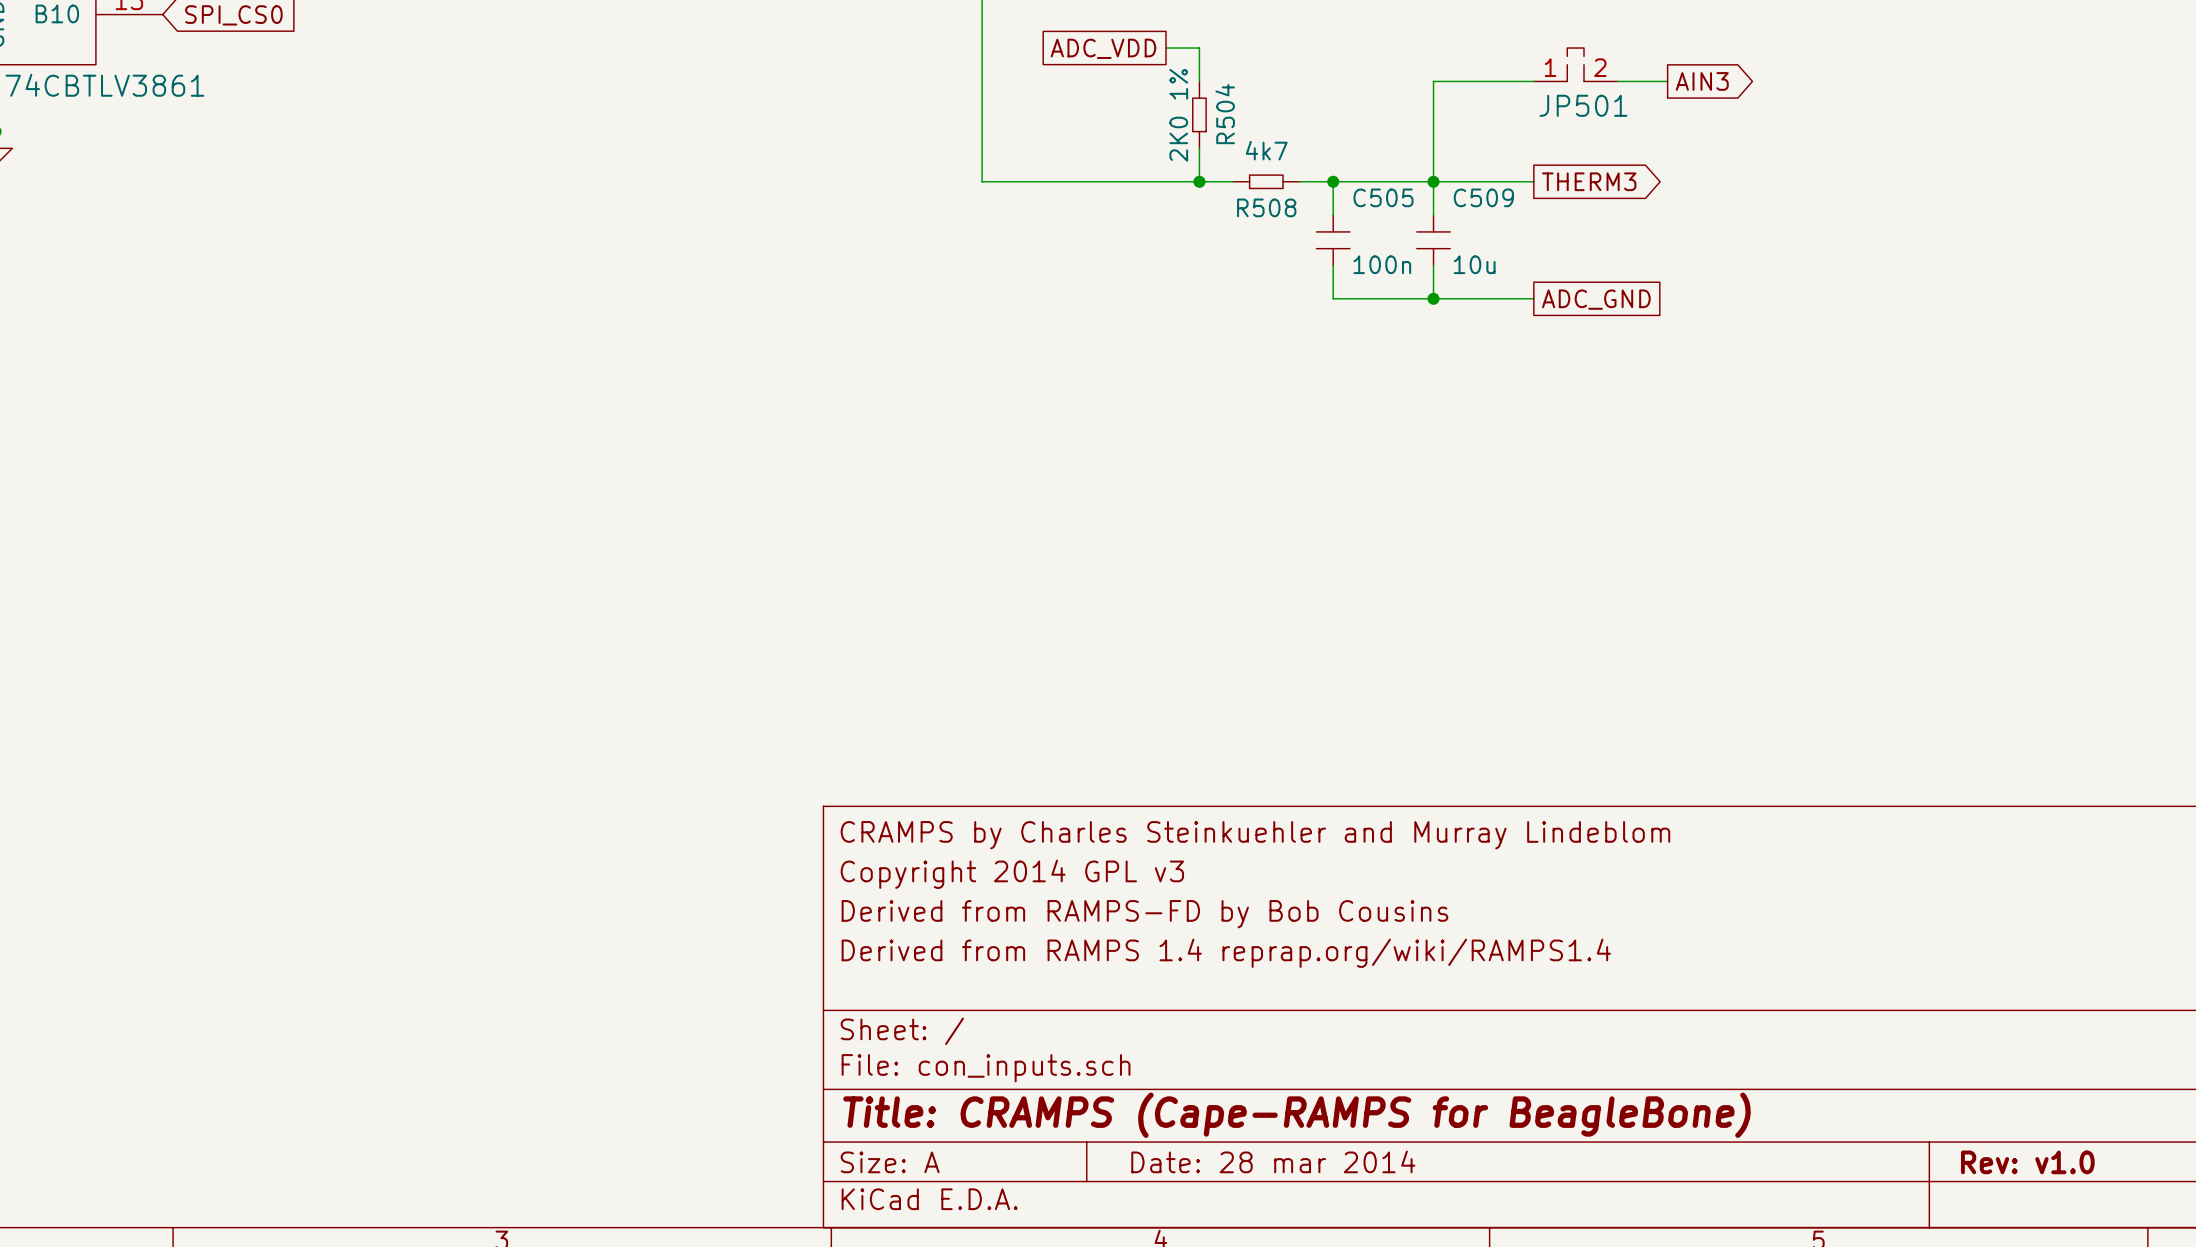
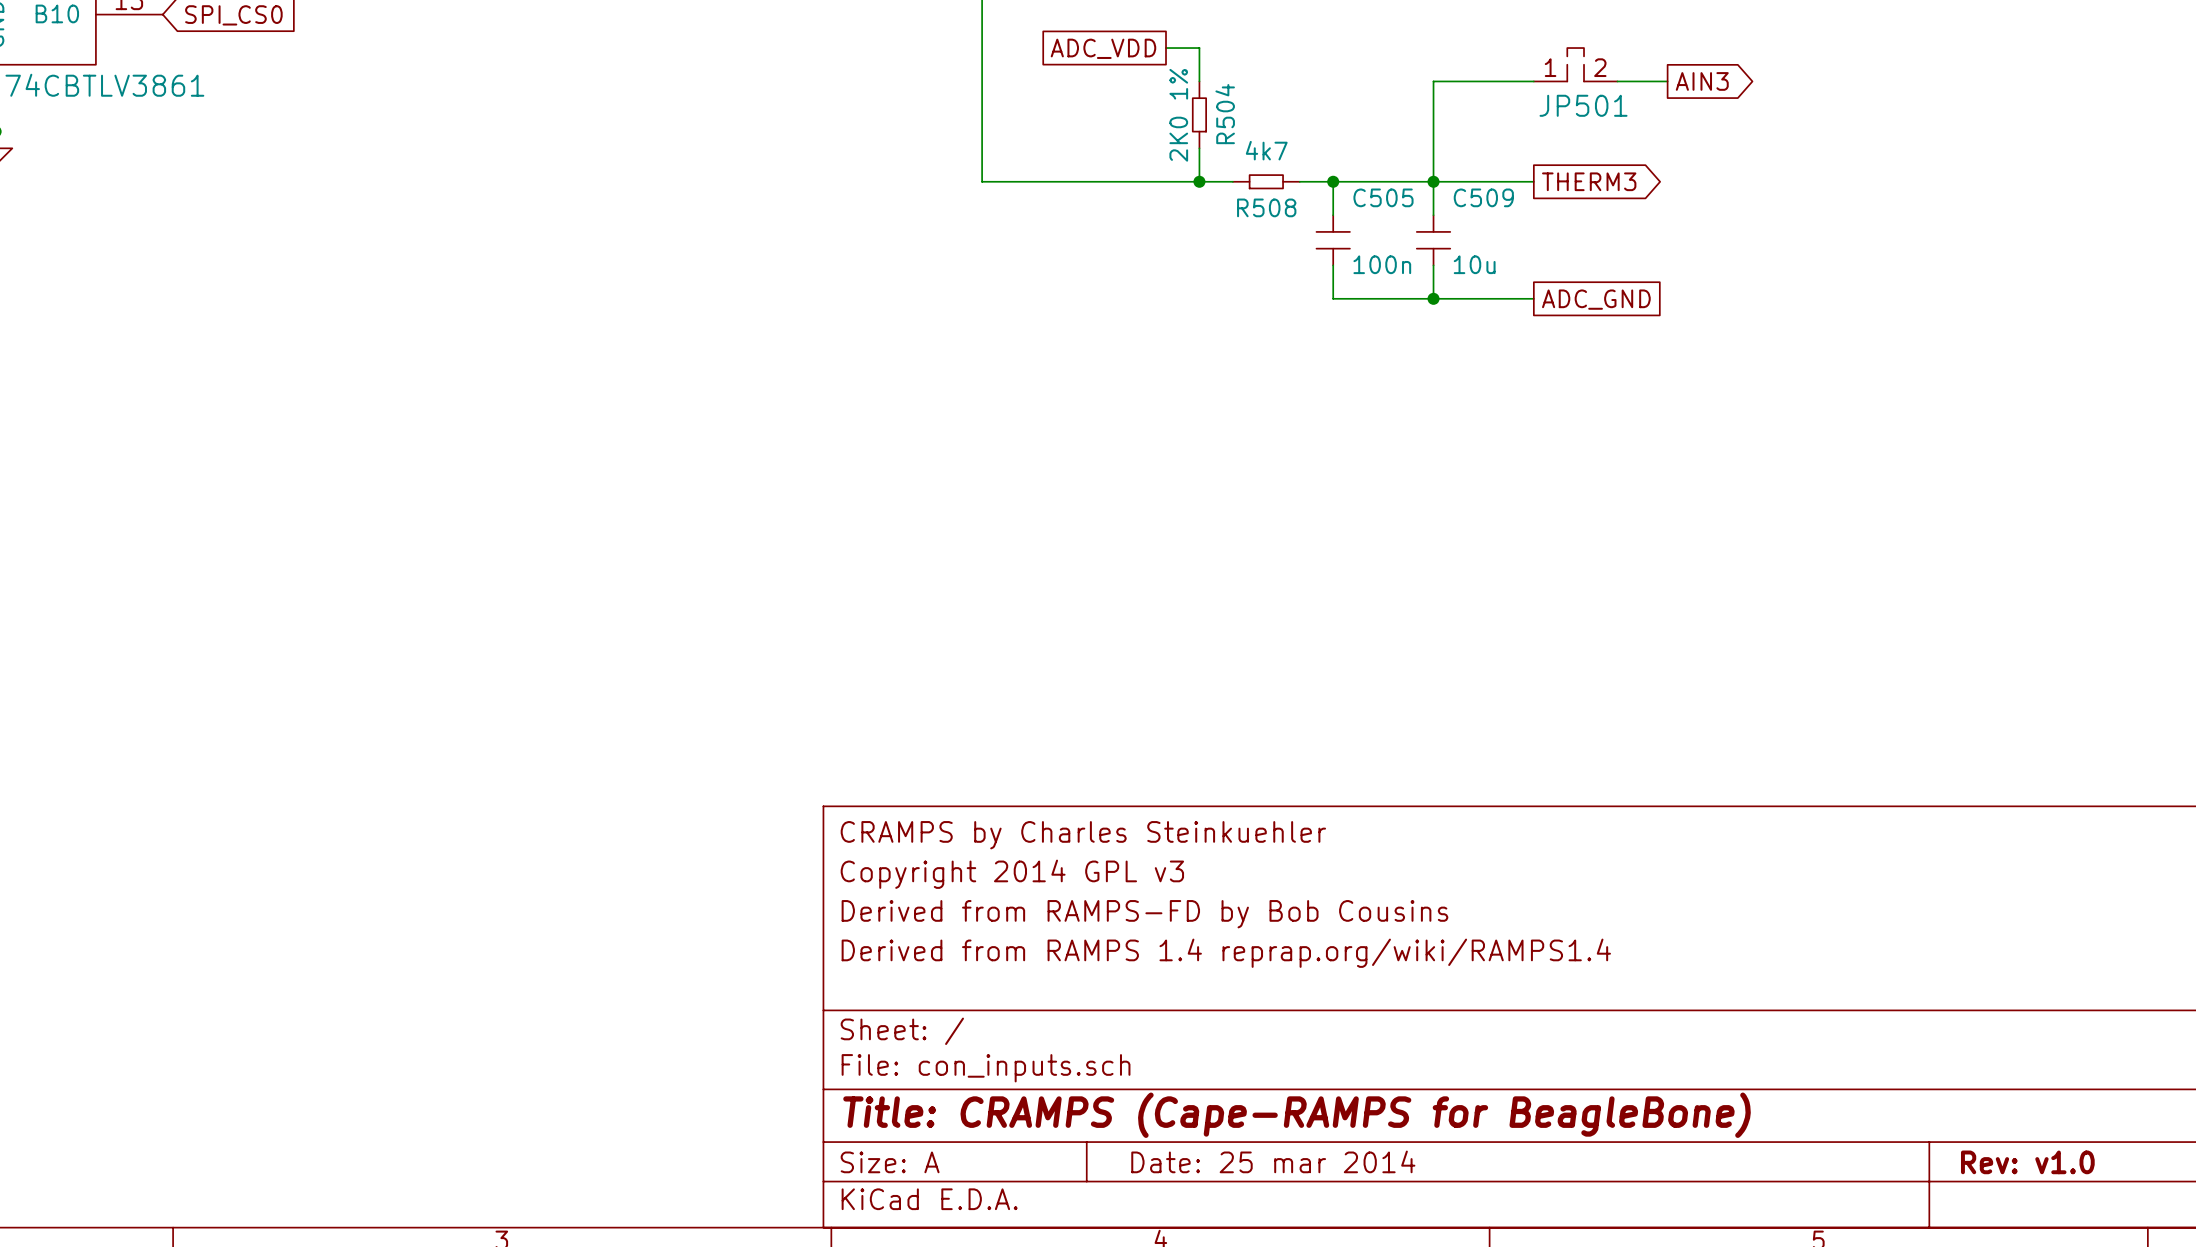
title block: CRAMPS by Charles Steinkuehler and Murray Lindeblom (1255, 835) -> CRAMPS by Charles Steinkuehler (1083, 835)
title block: Date: 28 mar 2014 (1273, 1161) -> Date: 25 mar 2014 (1273, 1161)

